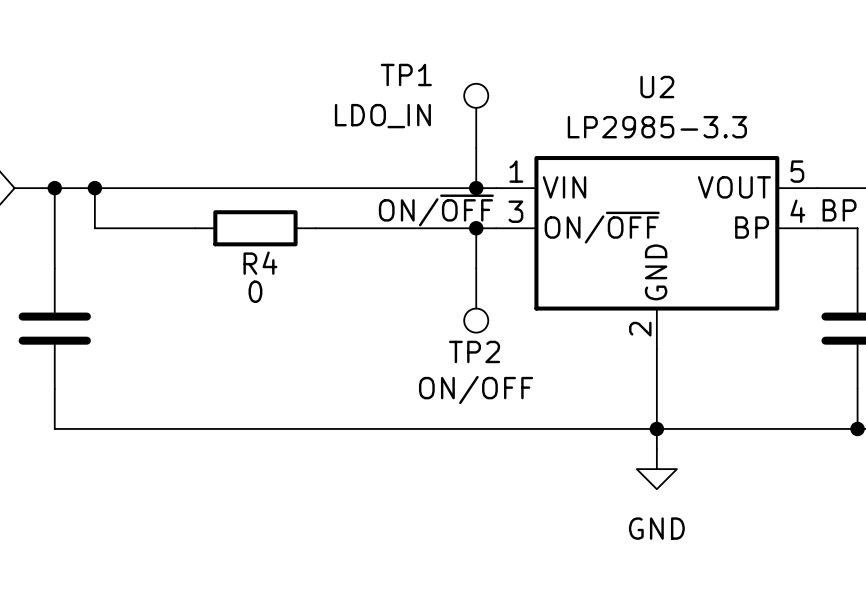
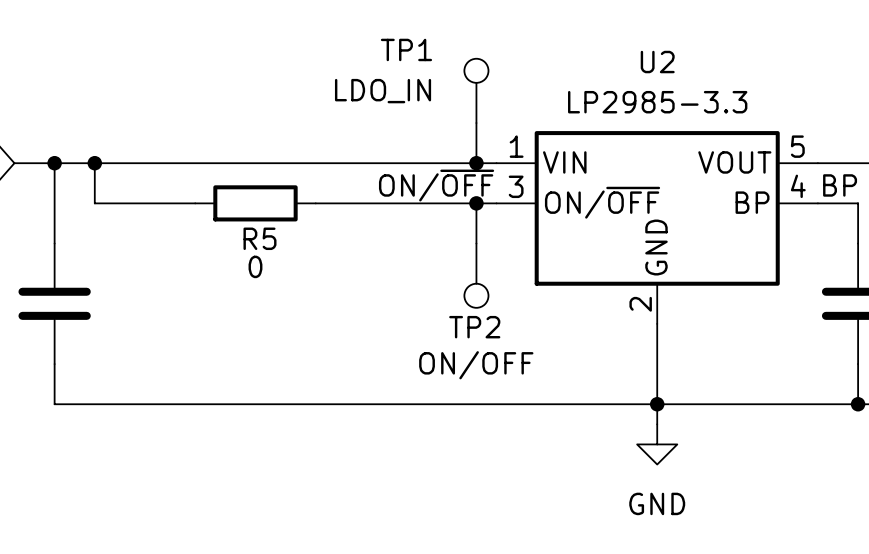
R4 name: R4 (260, 263) -> R5 (259, 238)

